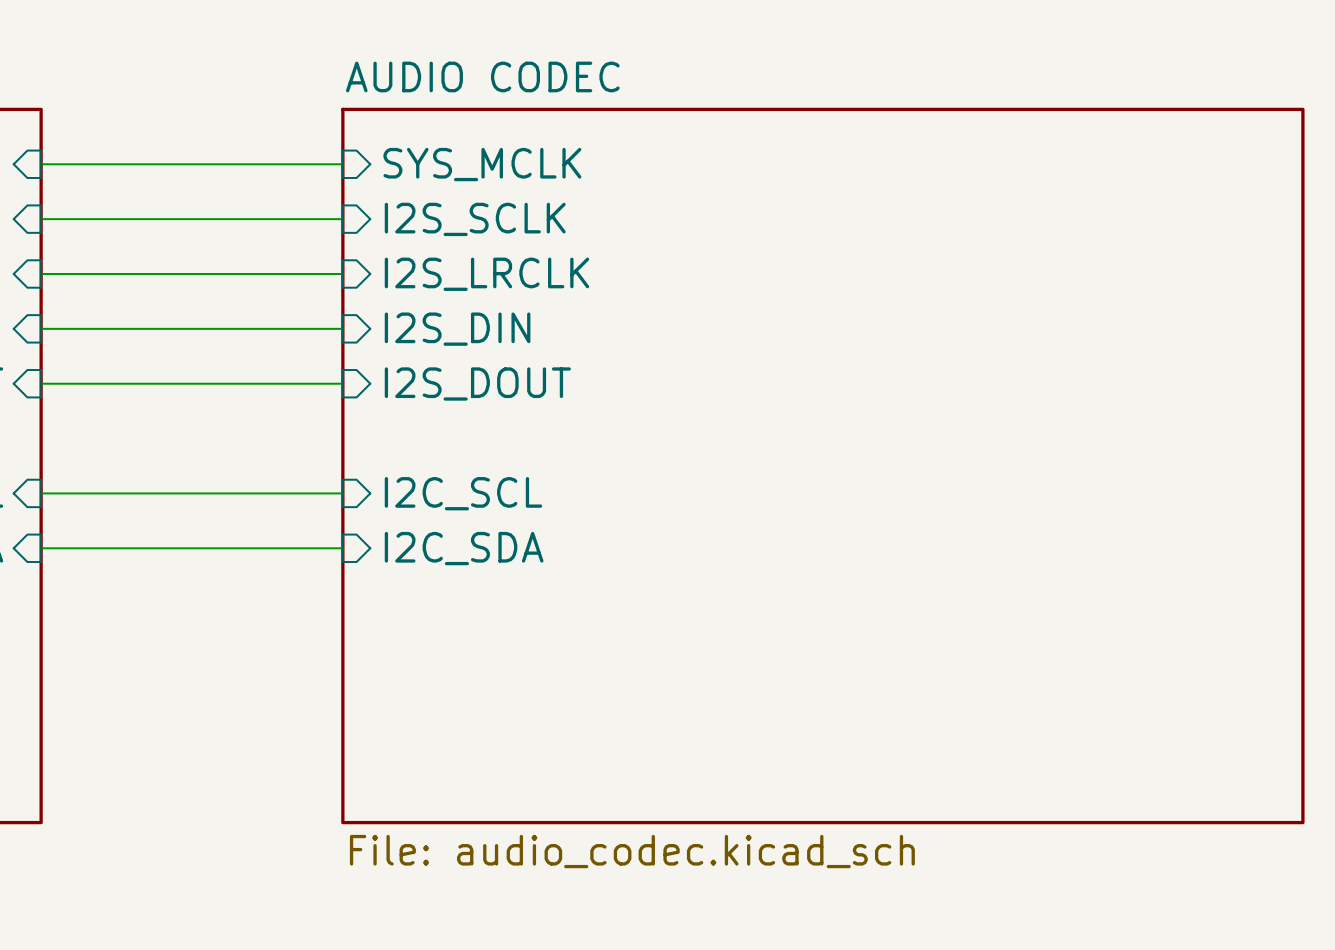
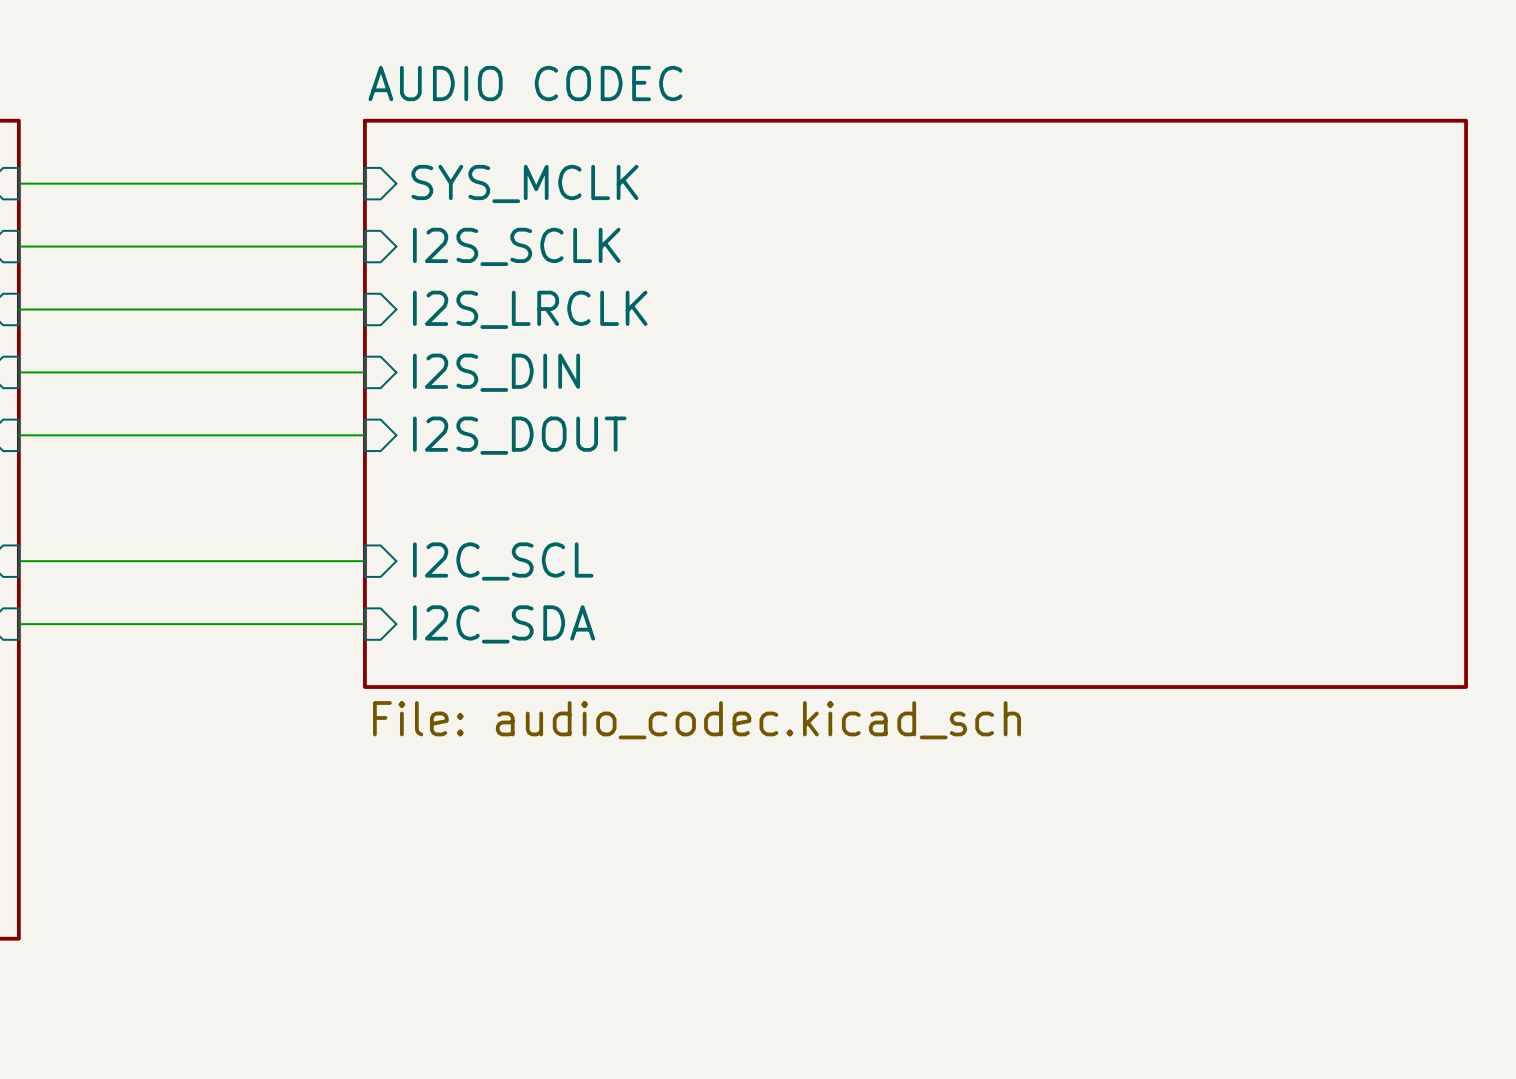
sheet AUDIO CODEC: none -> File: audio_codec.kicad_sch (915, 403)
sheet AUDIO CODEC: File: audio_codec.kicad_sch (822, 466) -> none

